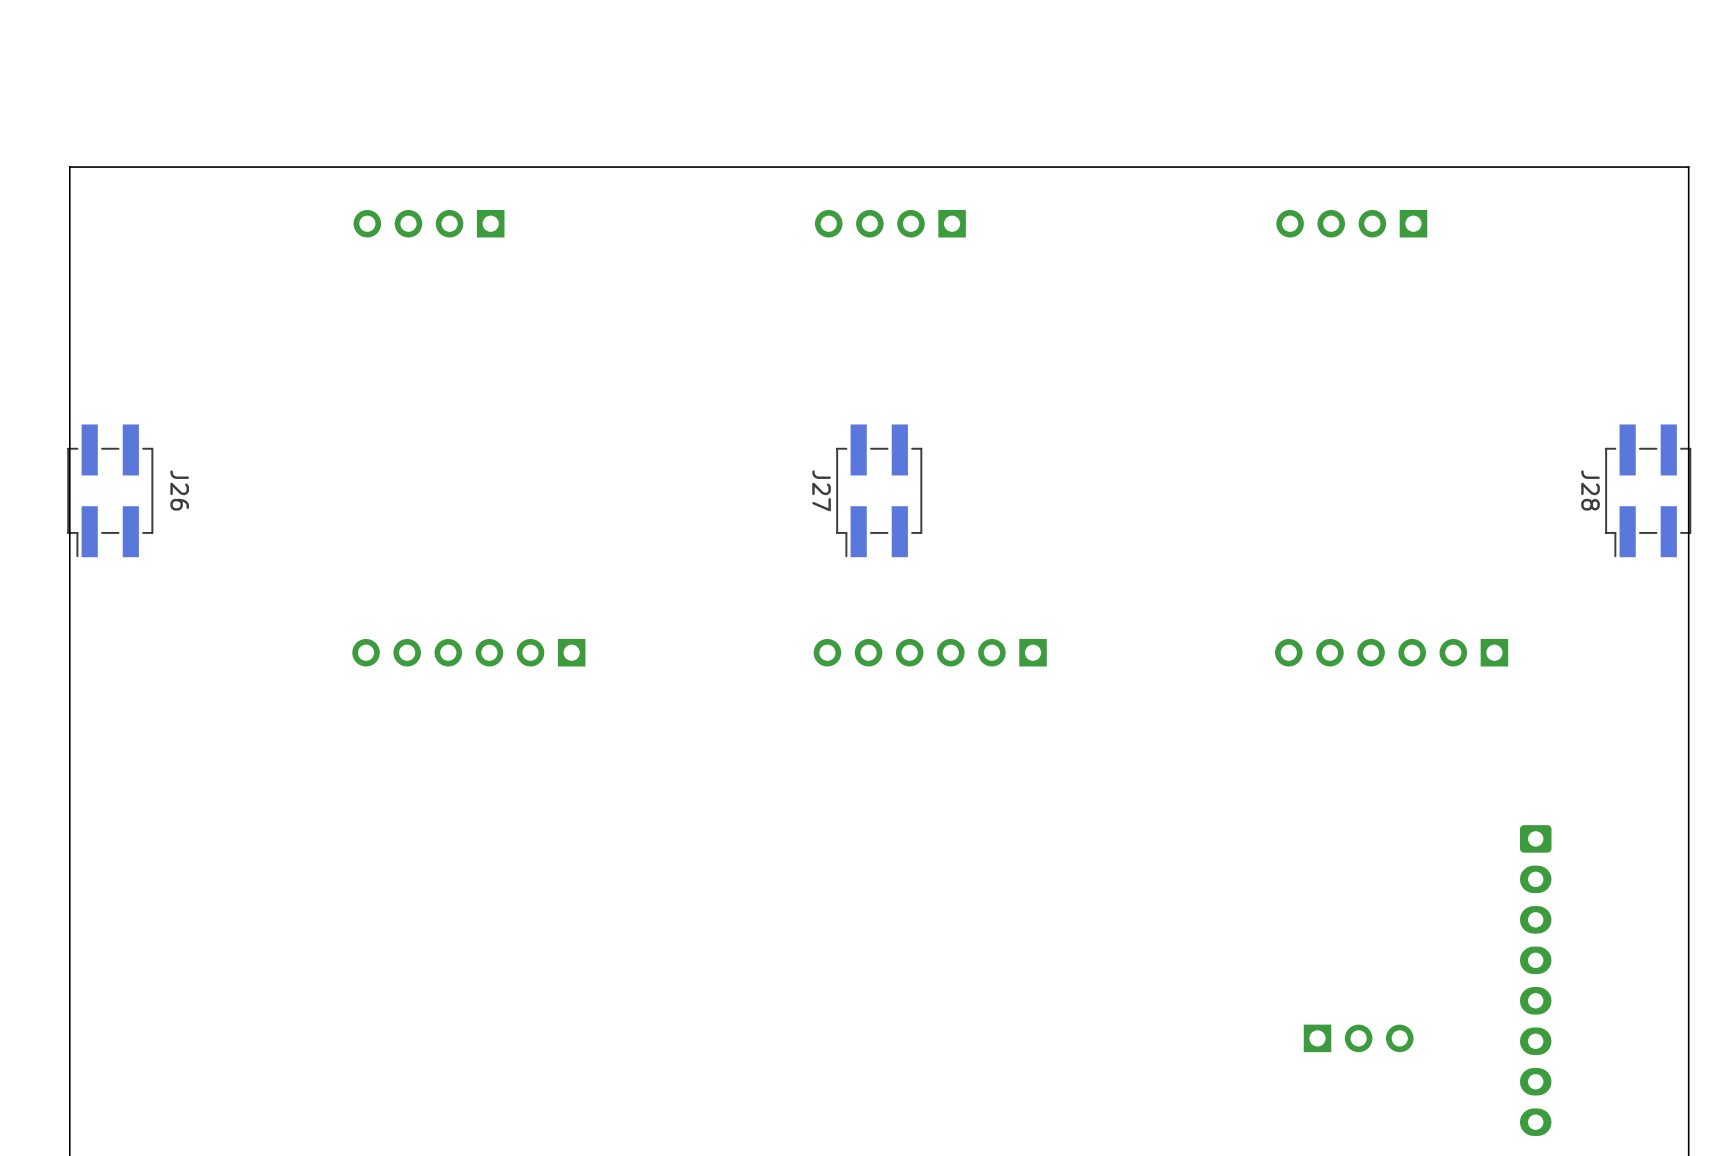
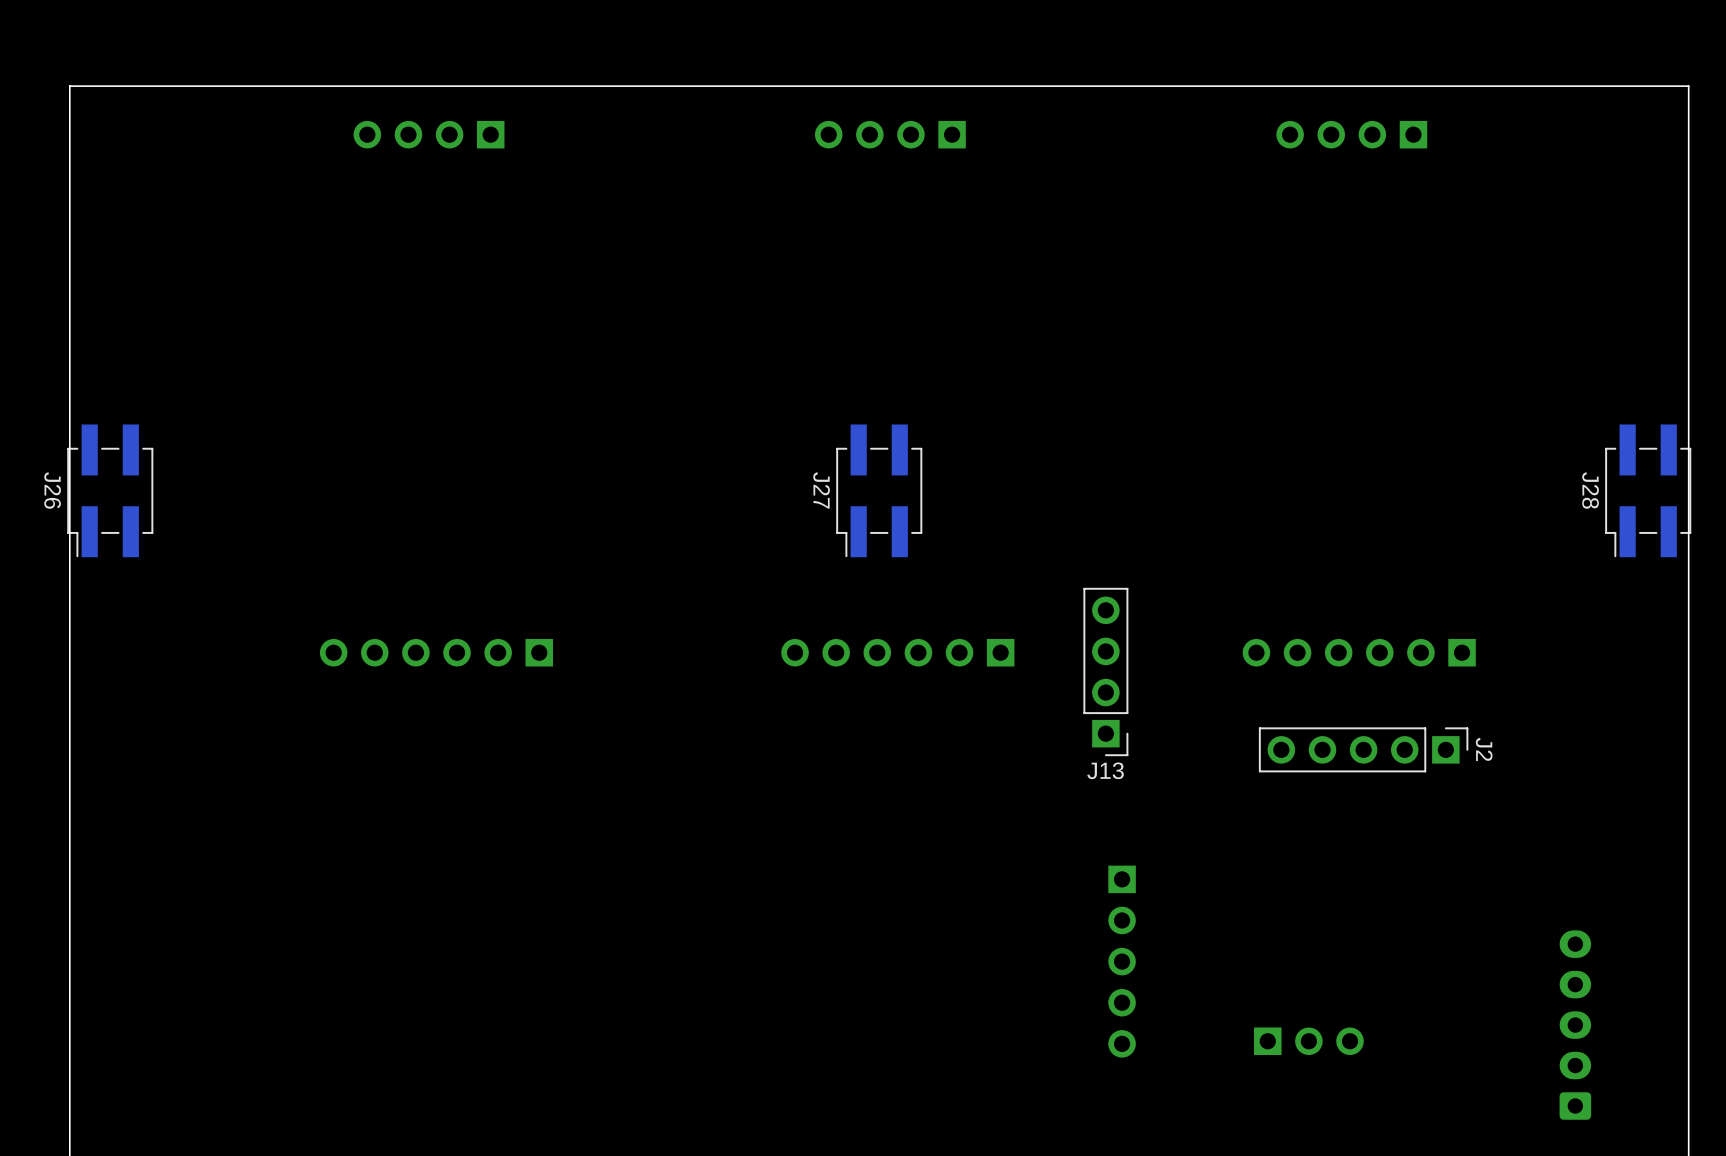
board edge: (1688, 167) (69, 167) -> (1688, 167) (1688, 86) (69, 86) (69, 167)
part position: (429, 223) -> (429, 134)
part position: (890, 223) -> (890, 134)
part position: (1351, 223) -> (1351, 134)
J26 name position: J26 (179, 490) -> J26 (52, 490)
part position: (468, 652) -> (436, 652)
part position: (930, 652) -> (897, 652)
part position: (1391, 652) -> (1359, 652)
J13: none -> (1105, 671)
J2: none -> (1363, 749)
part: none -> (1122, 961)
part: (1535, 980) -> none
part: none -> (1575, 1025)
part position: (1358, 1038) -> (1308, 1041)

